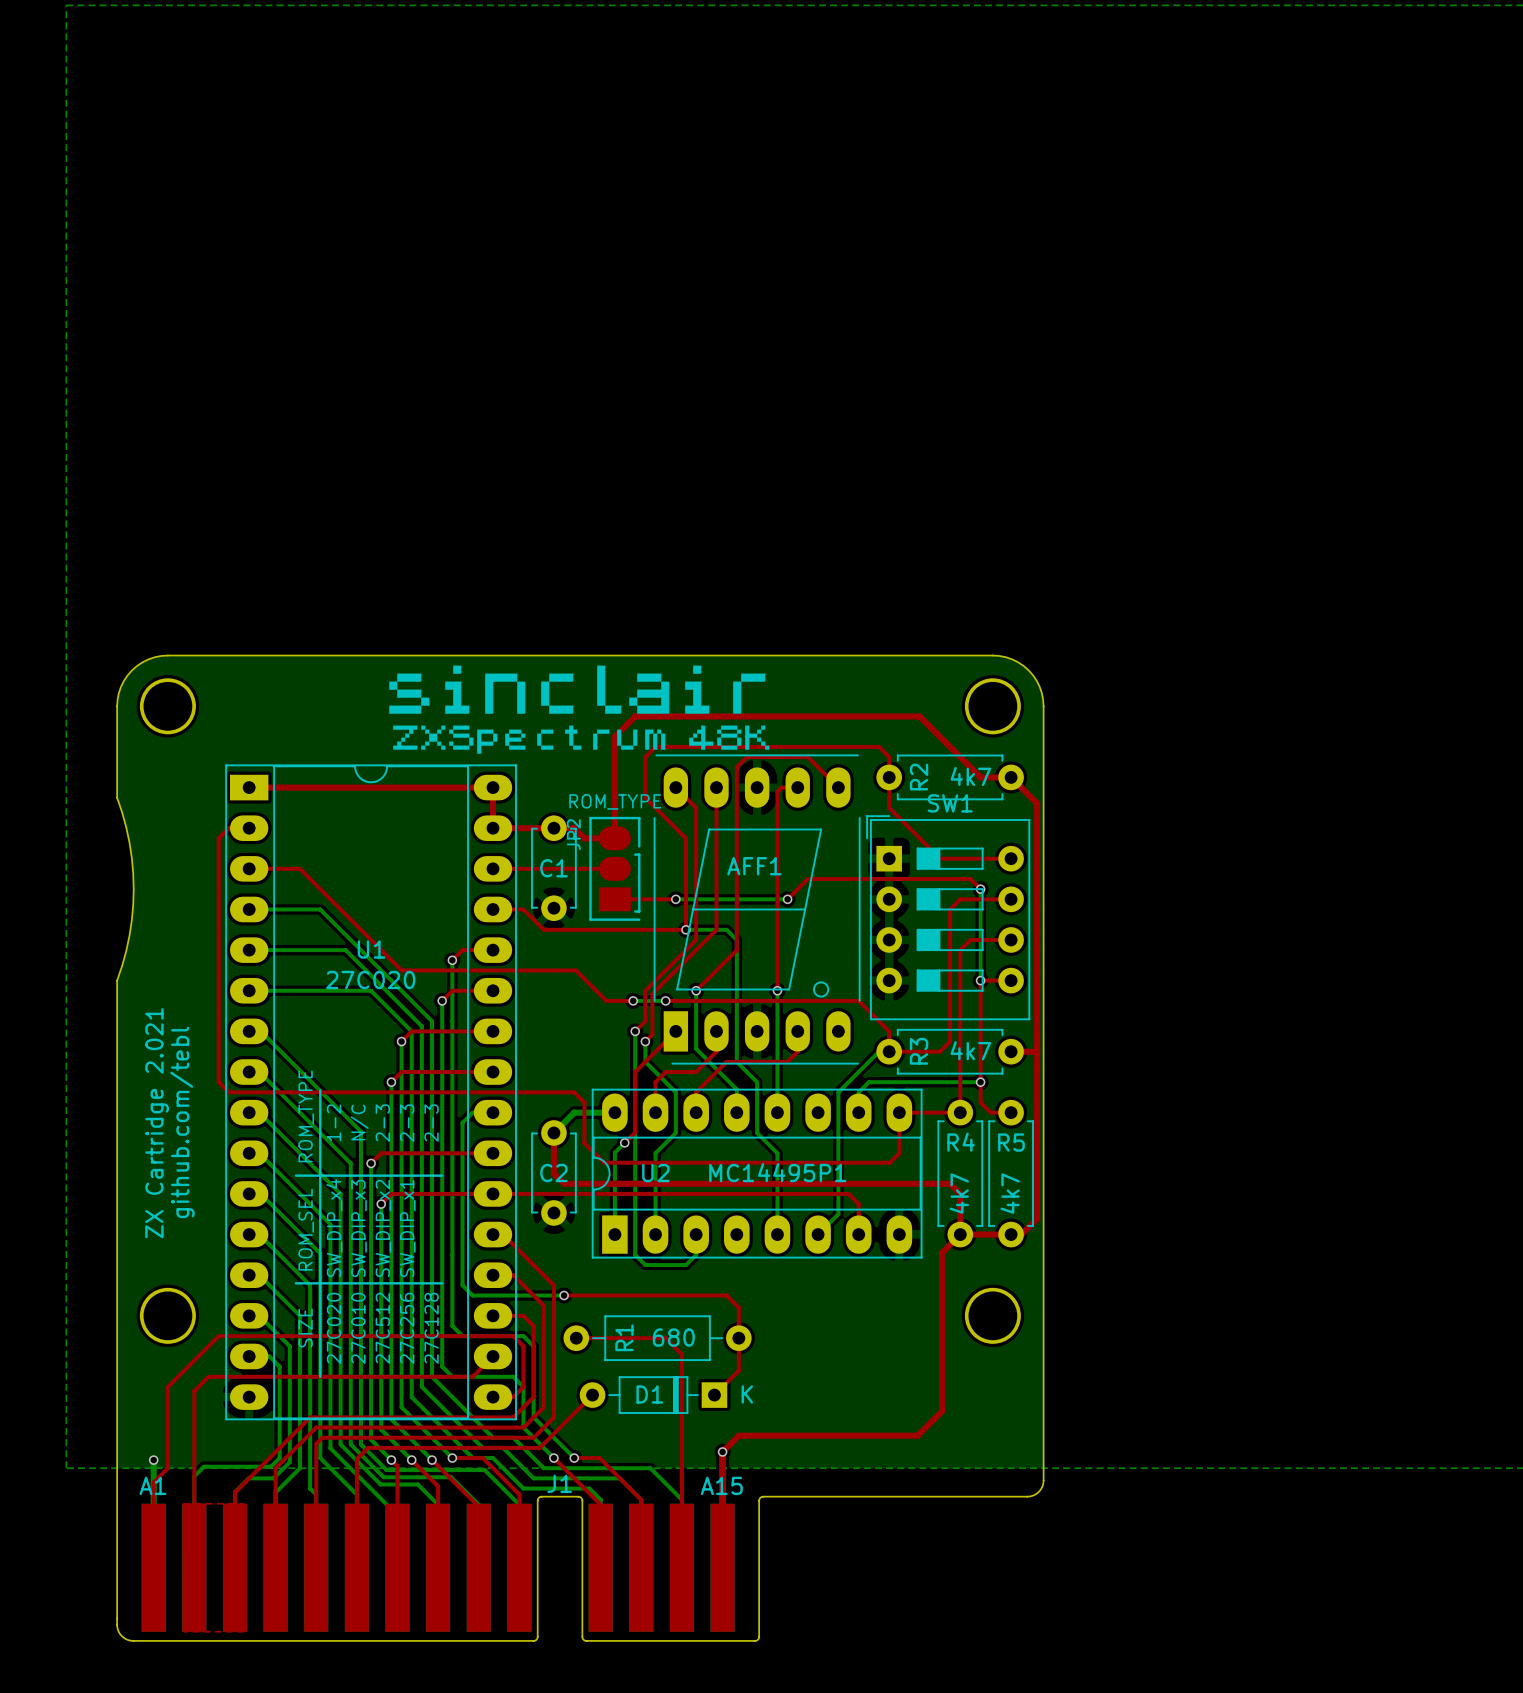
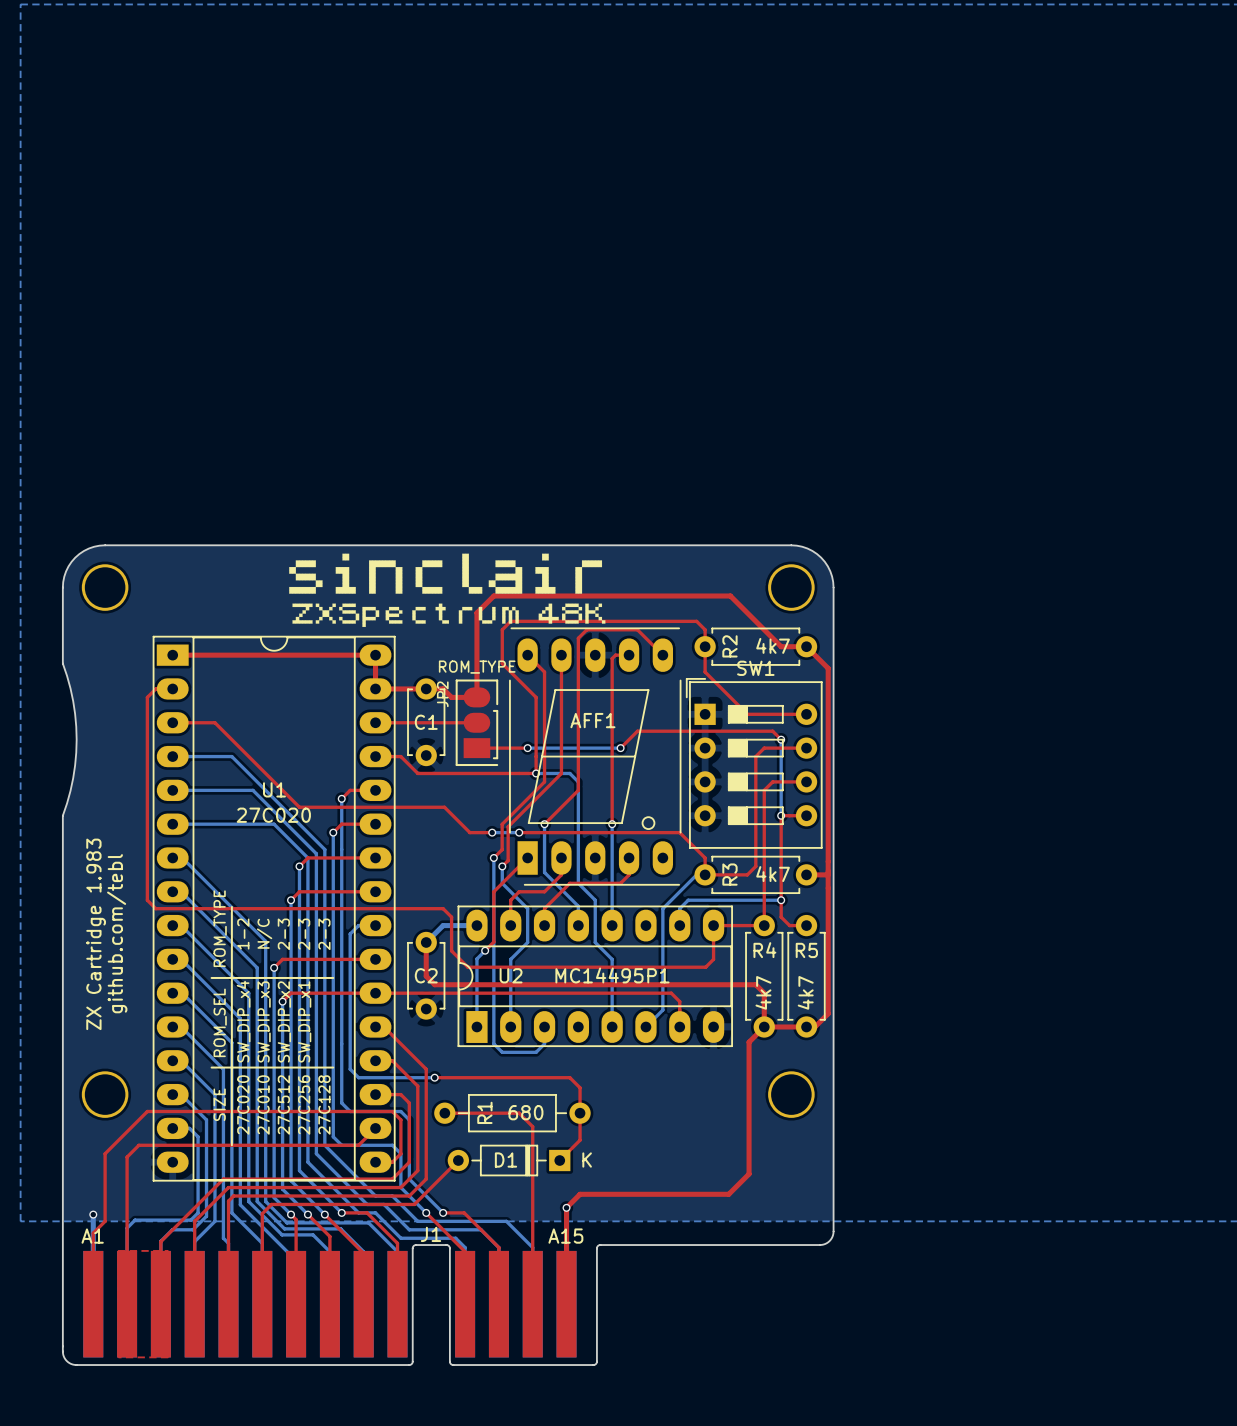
text: ZX Cartridge 2.021 (157, 1123) -> ZX Cartridge 1.983 (96, 934)

